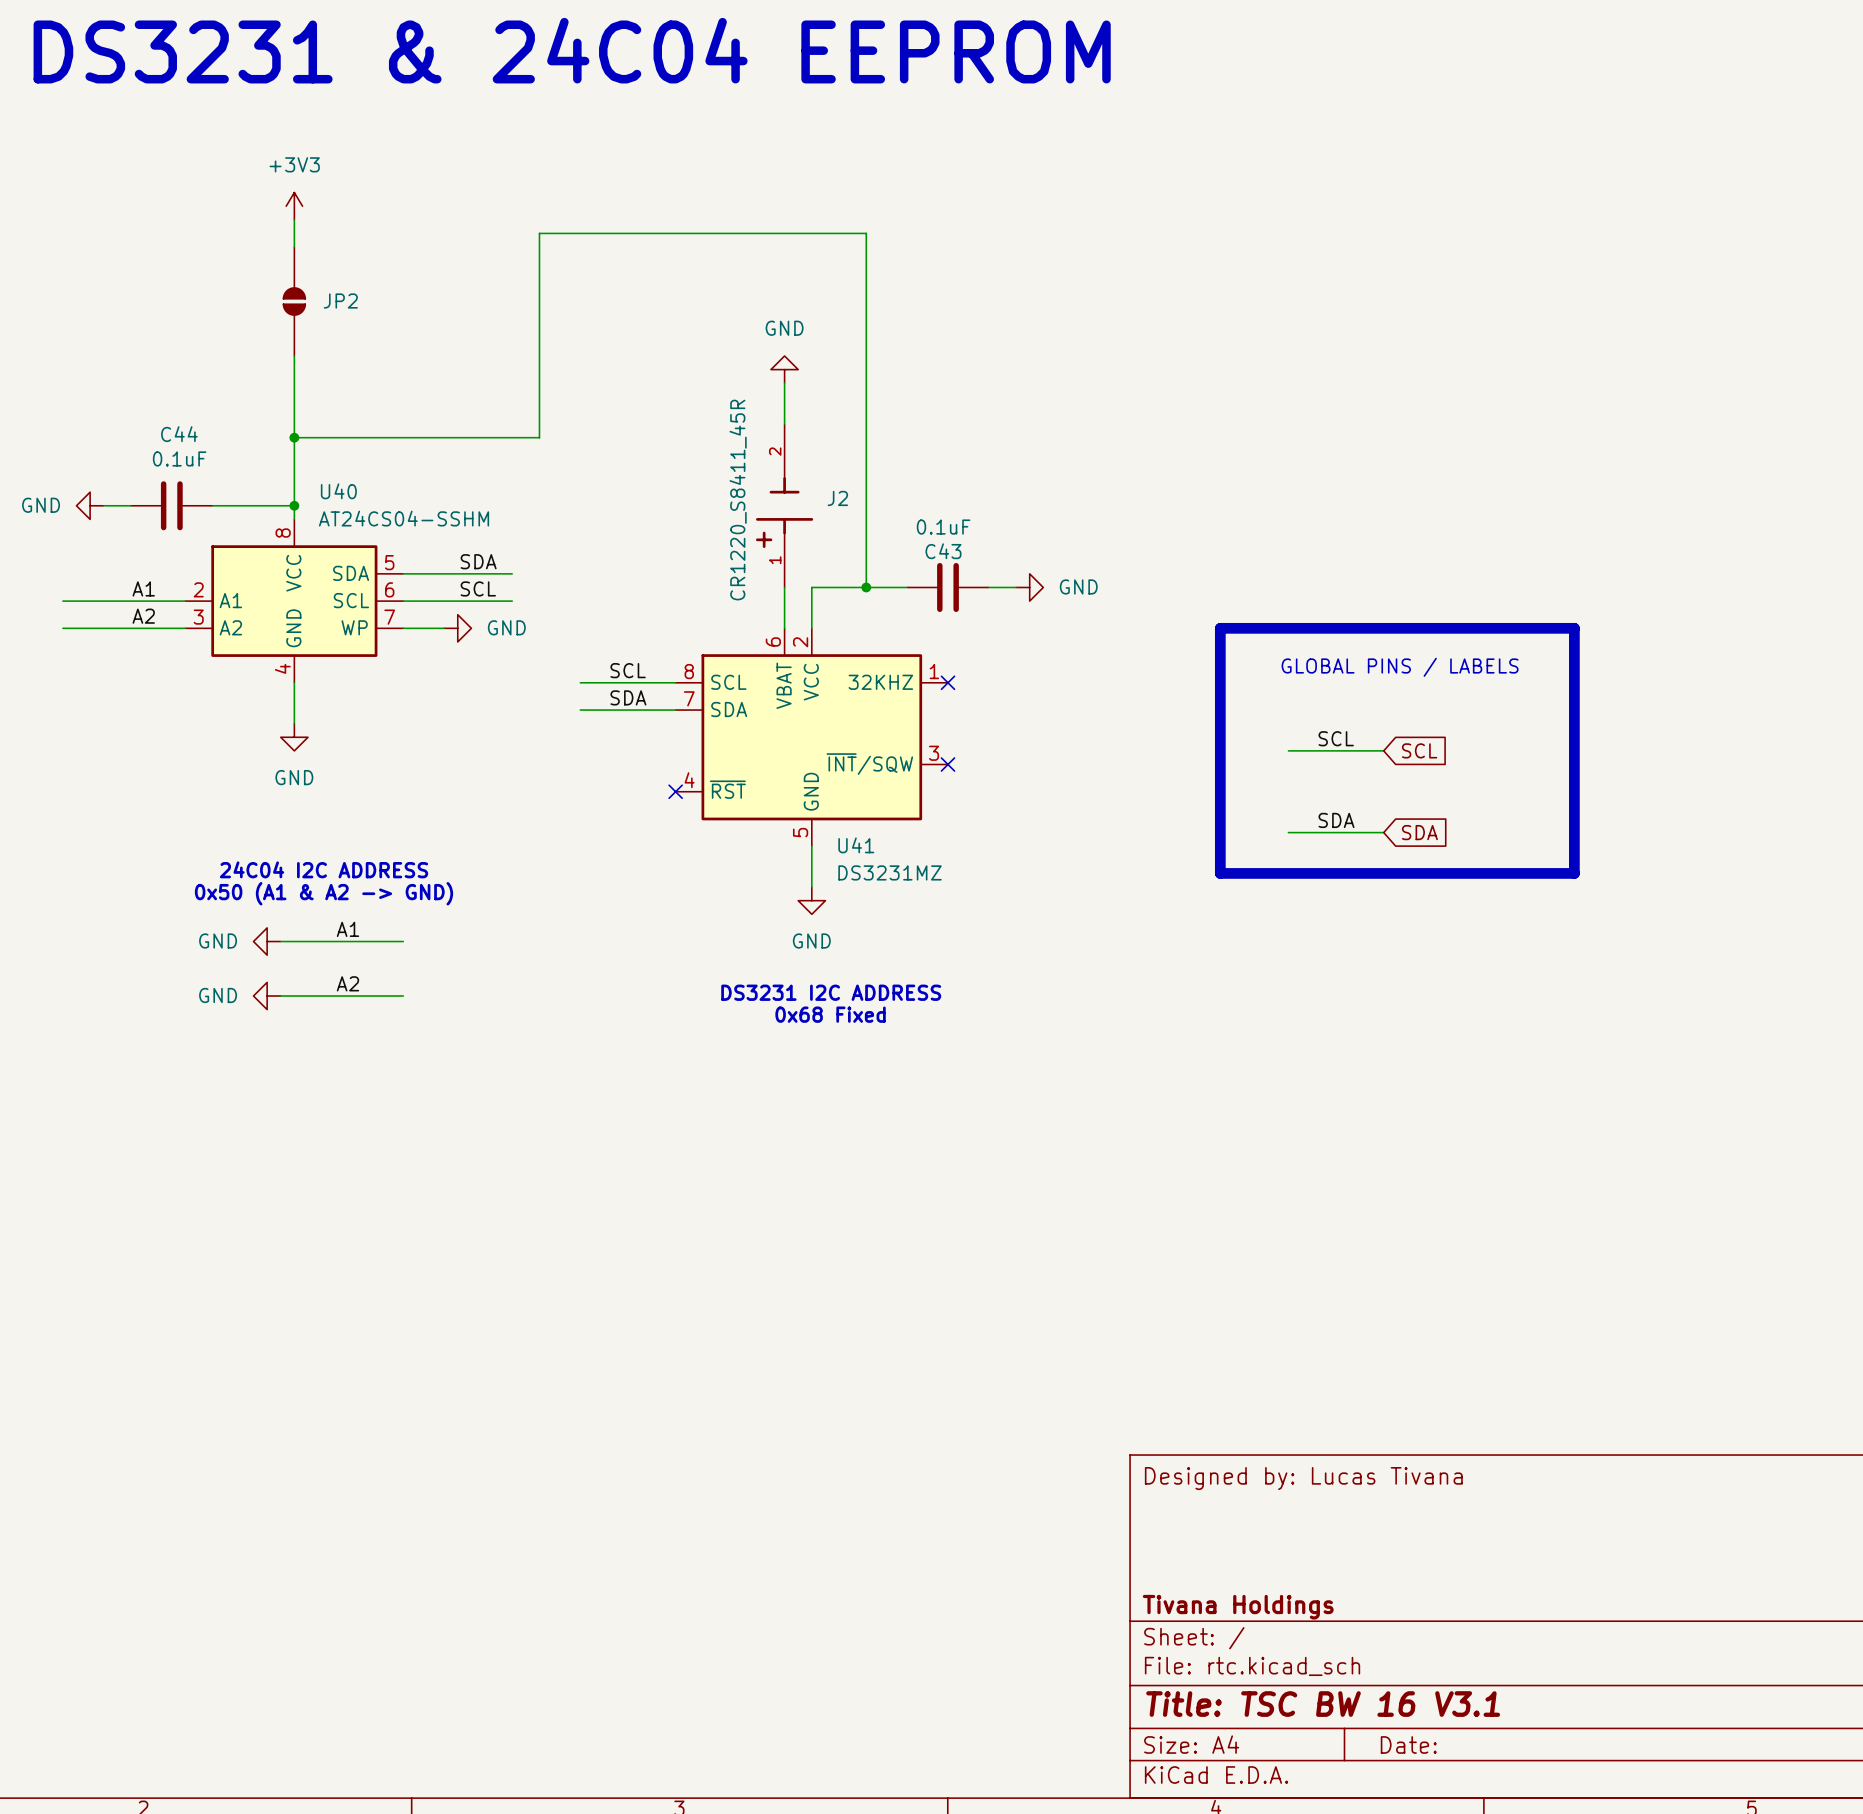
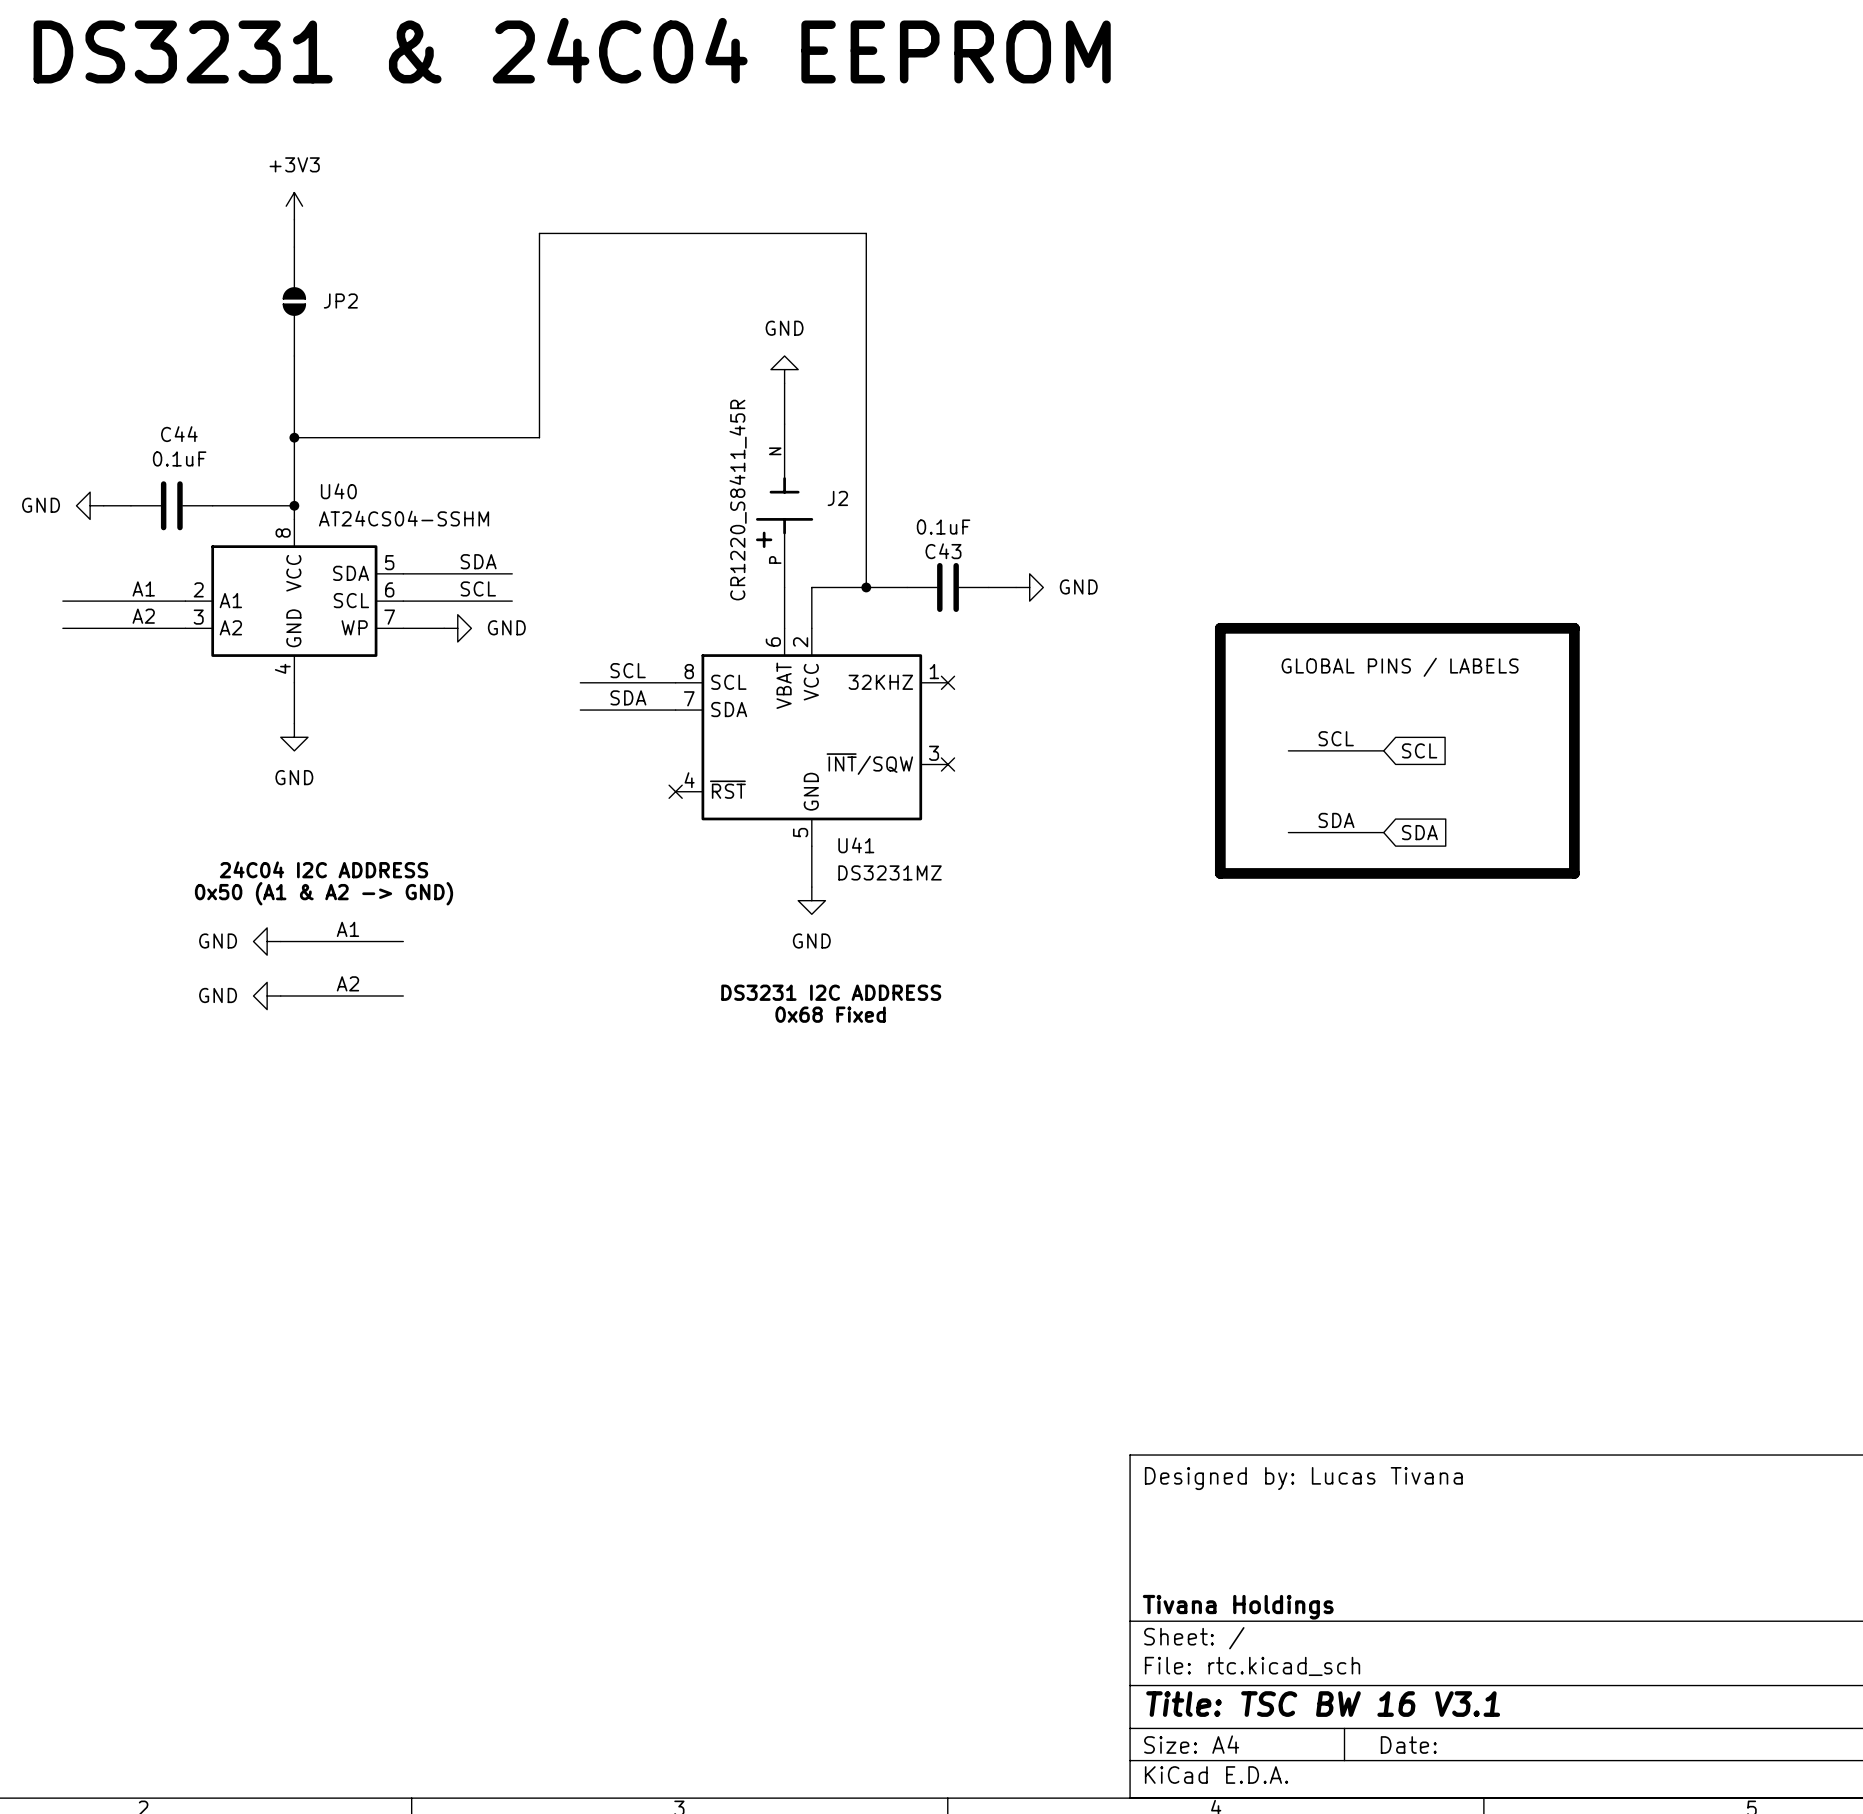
J2 pin number: 2 (775, 451) -> N (775, 451)
J2 pin number: 1 (775, 560) -> P (775, 559)

